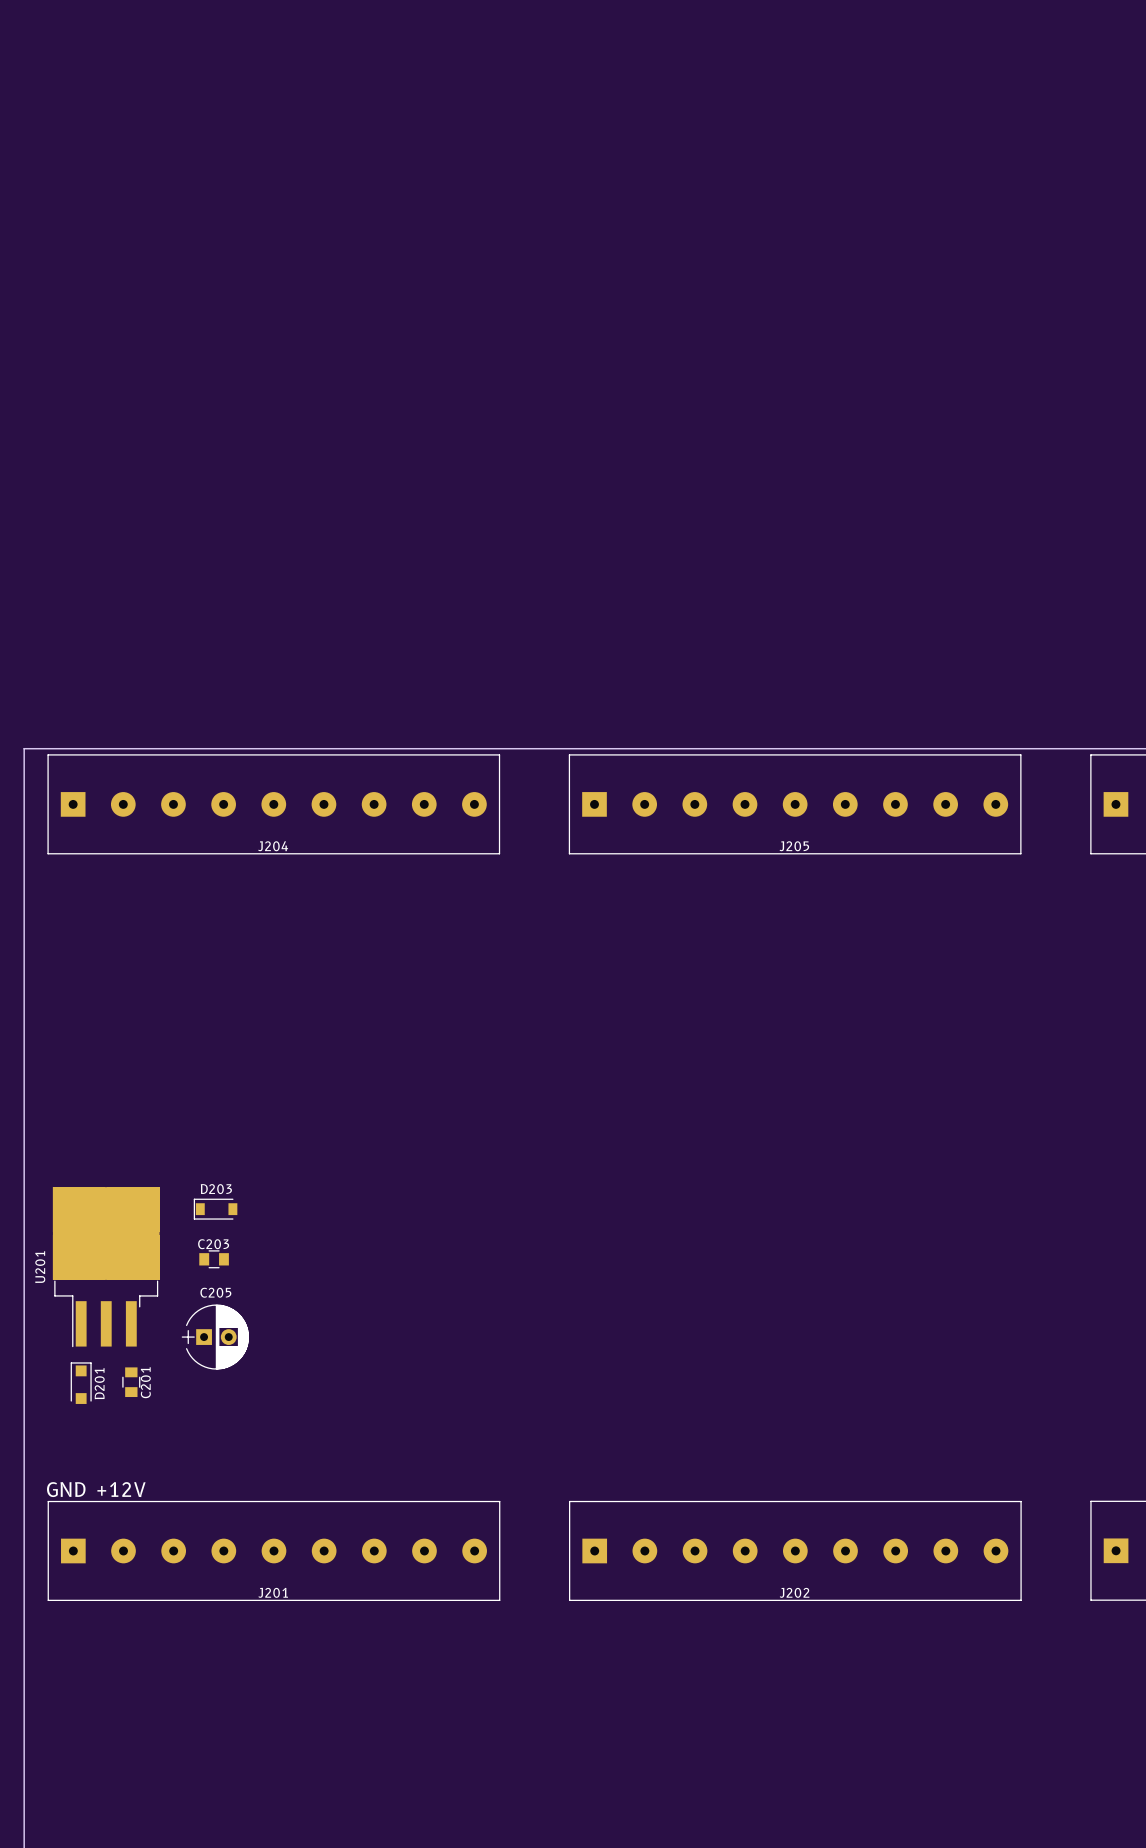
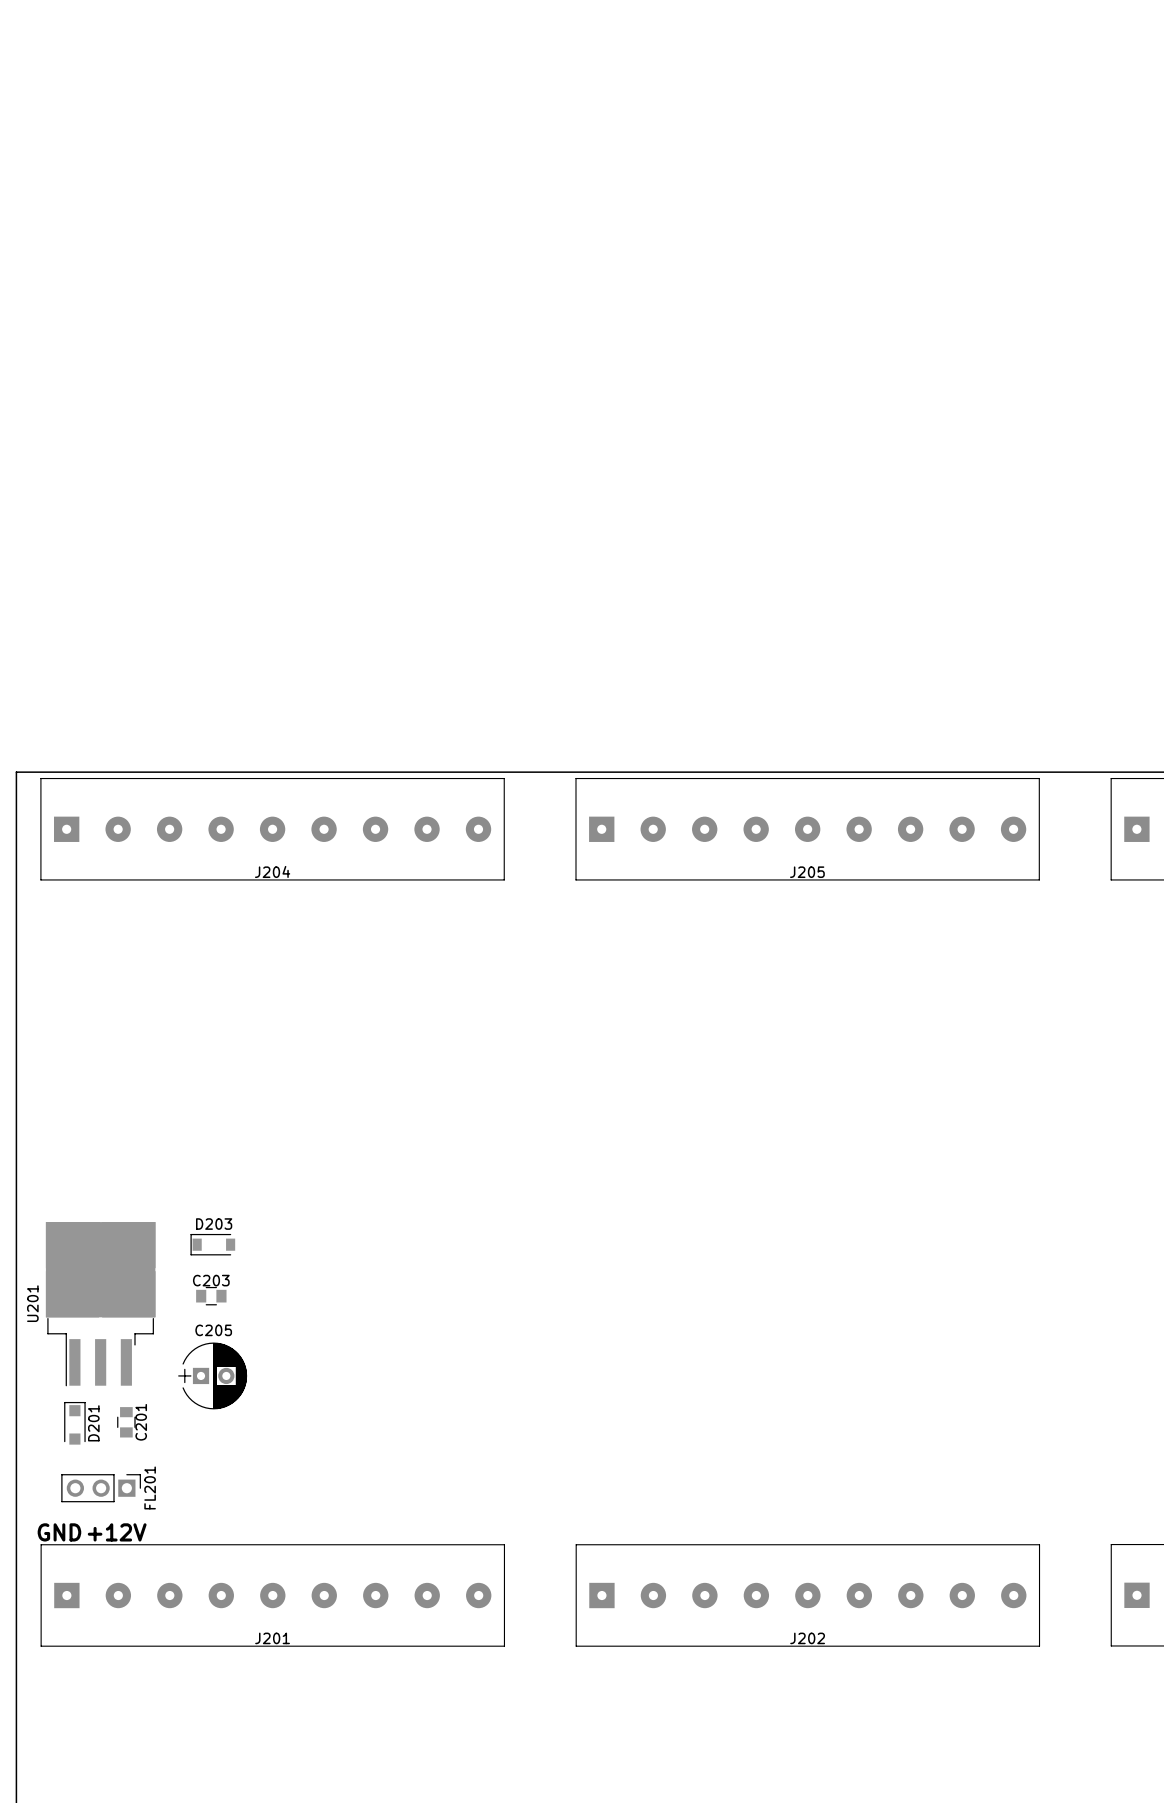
FL201: none -> (101, 1488)

